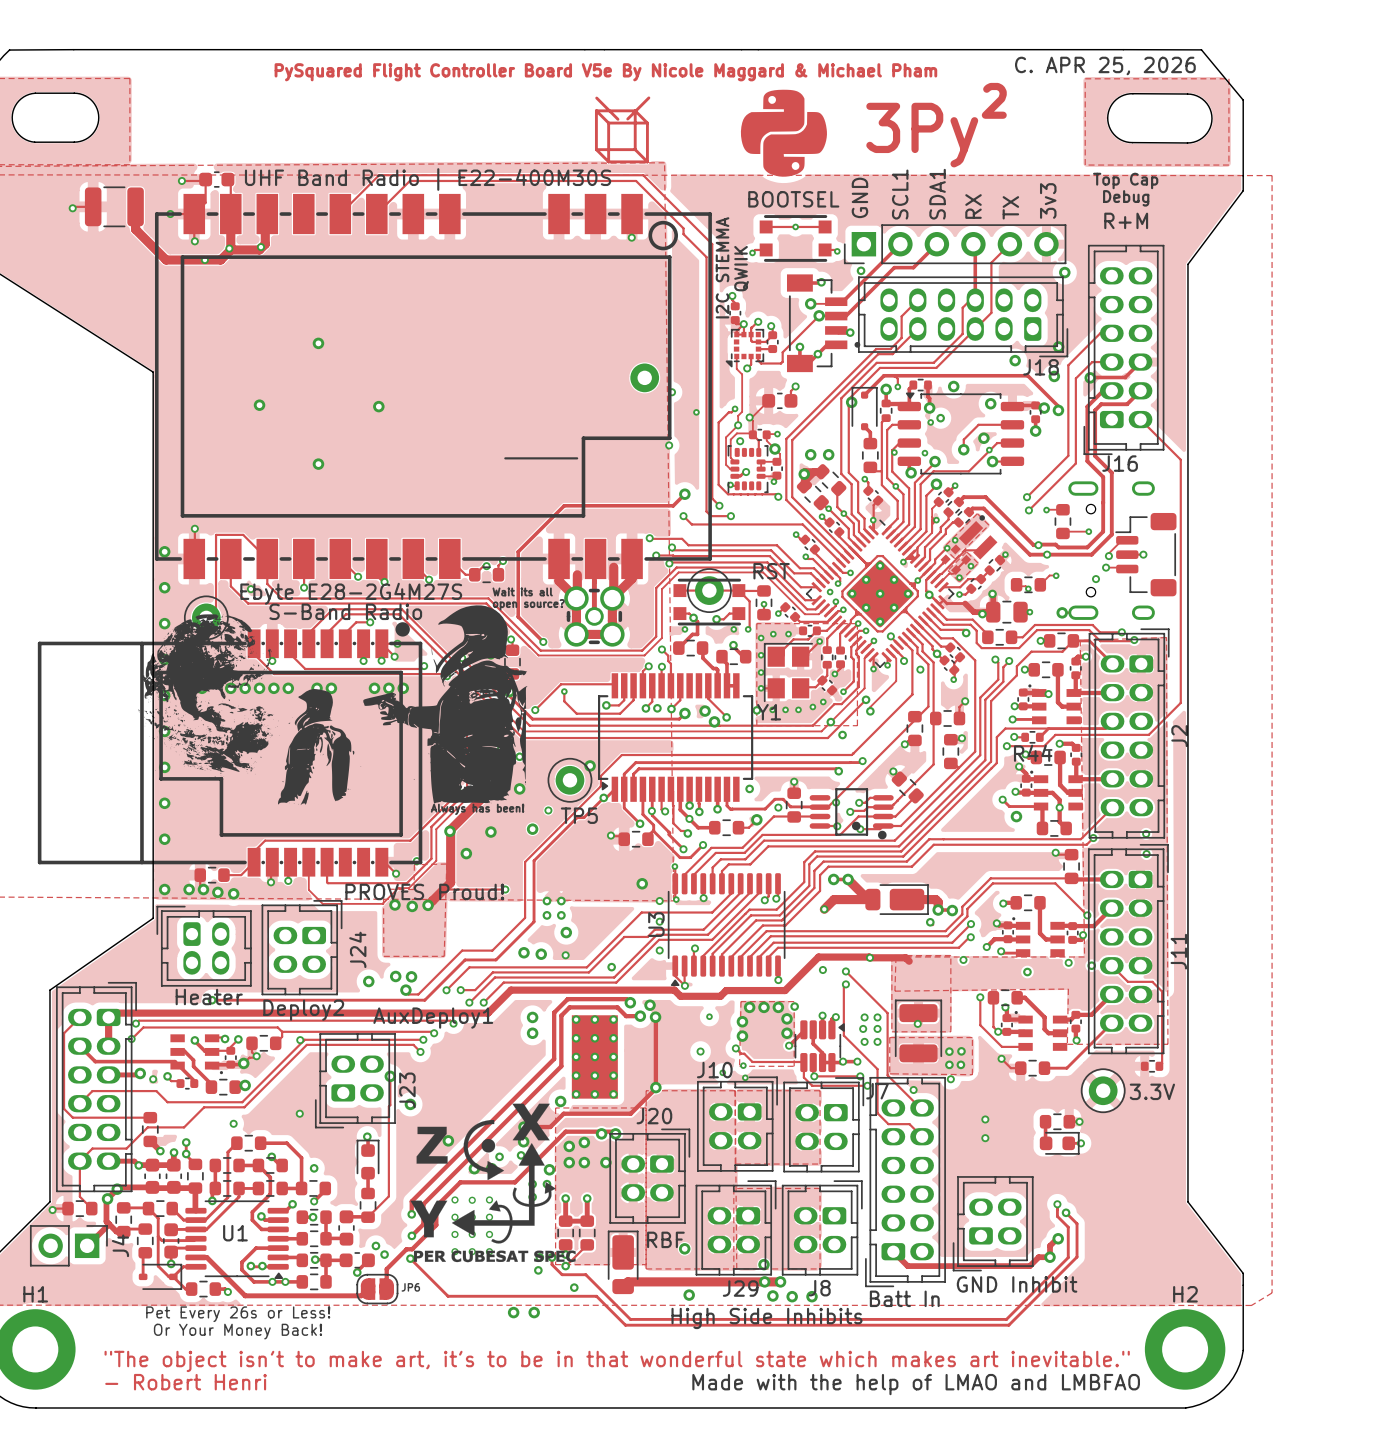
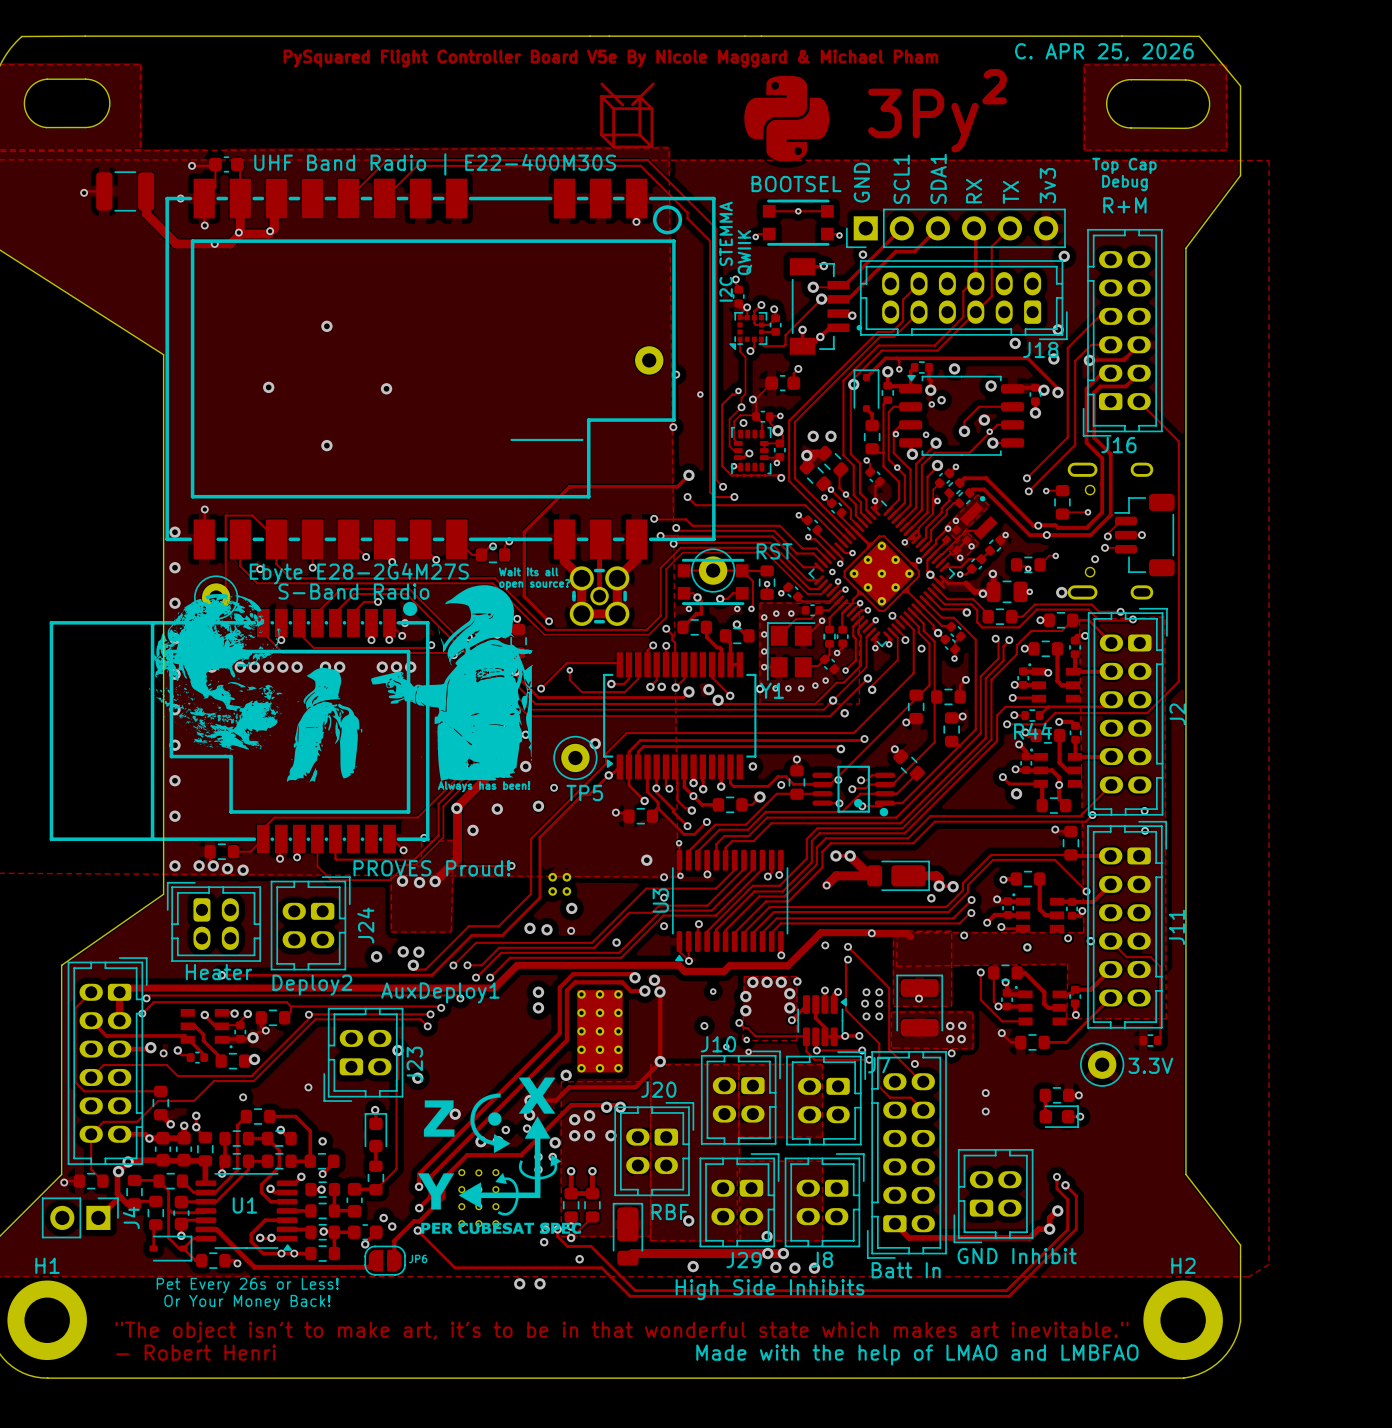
track: (613, 567) (613, 596) -> none
track: (577, 574) (576, 598) -> none

